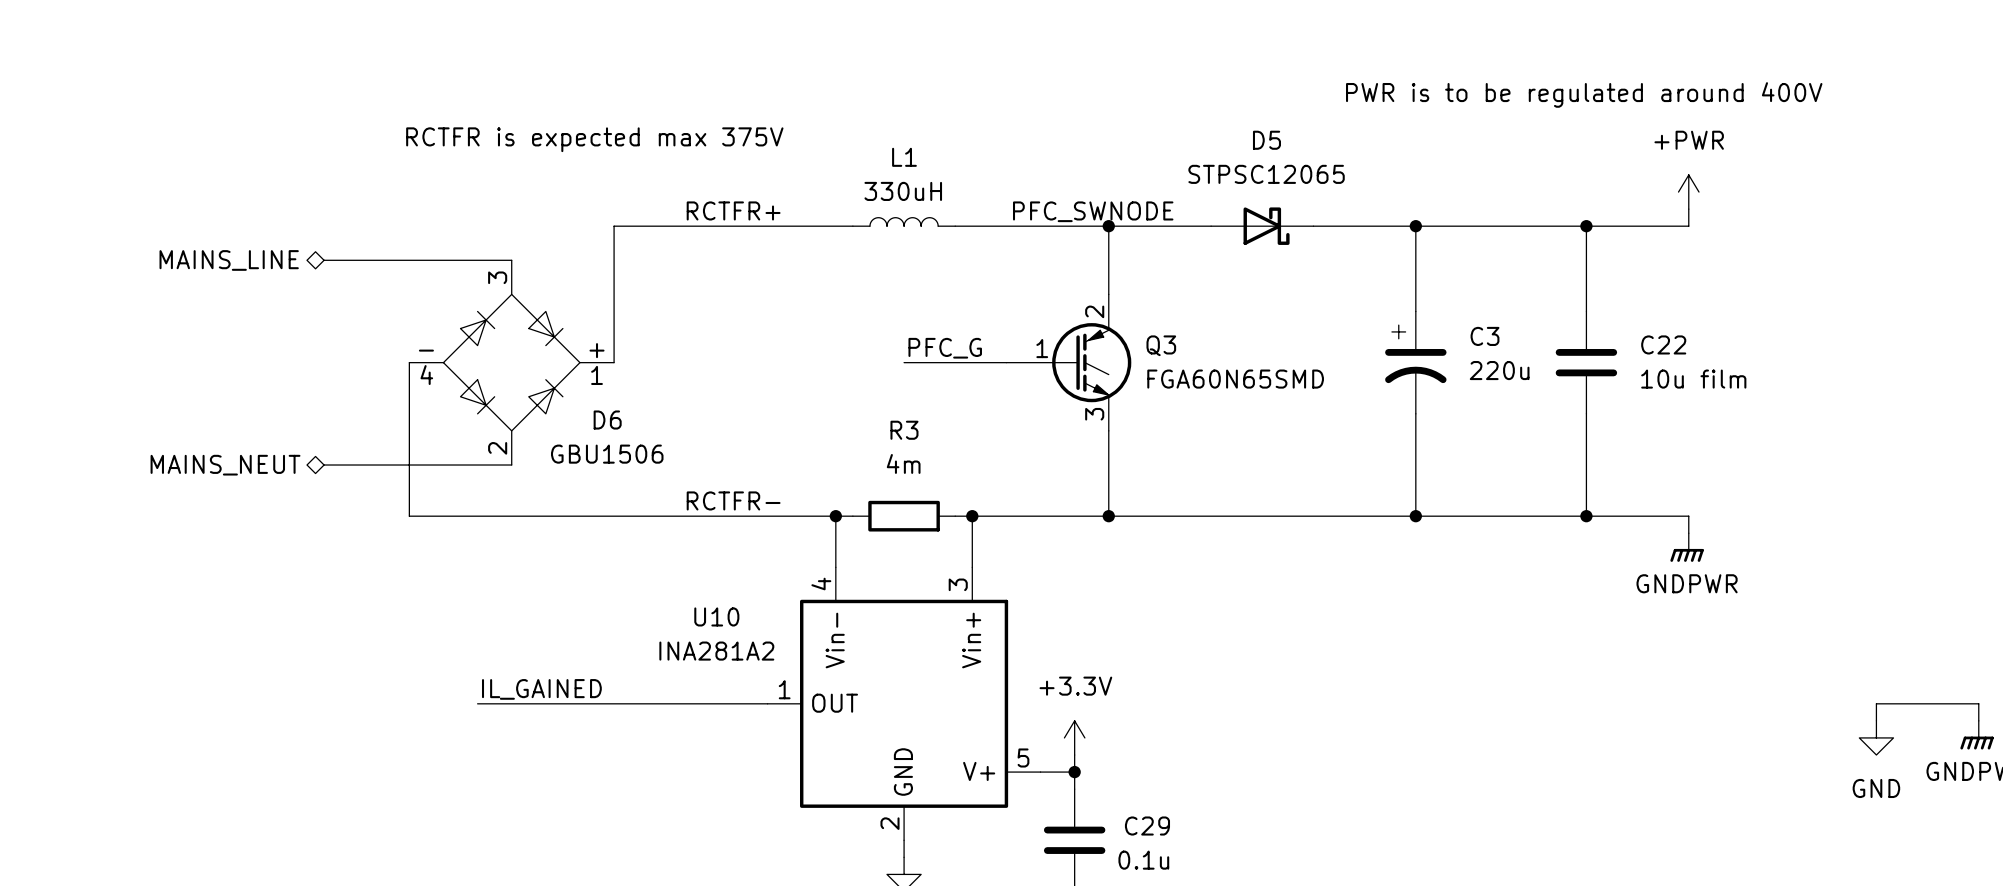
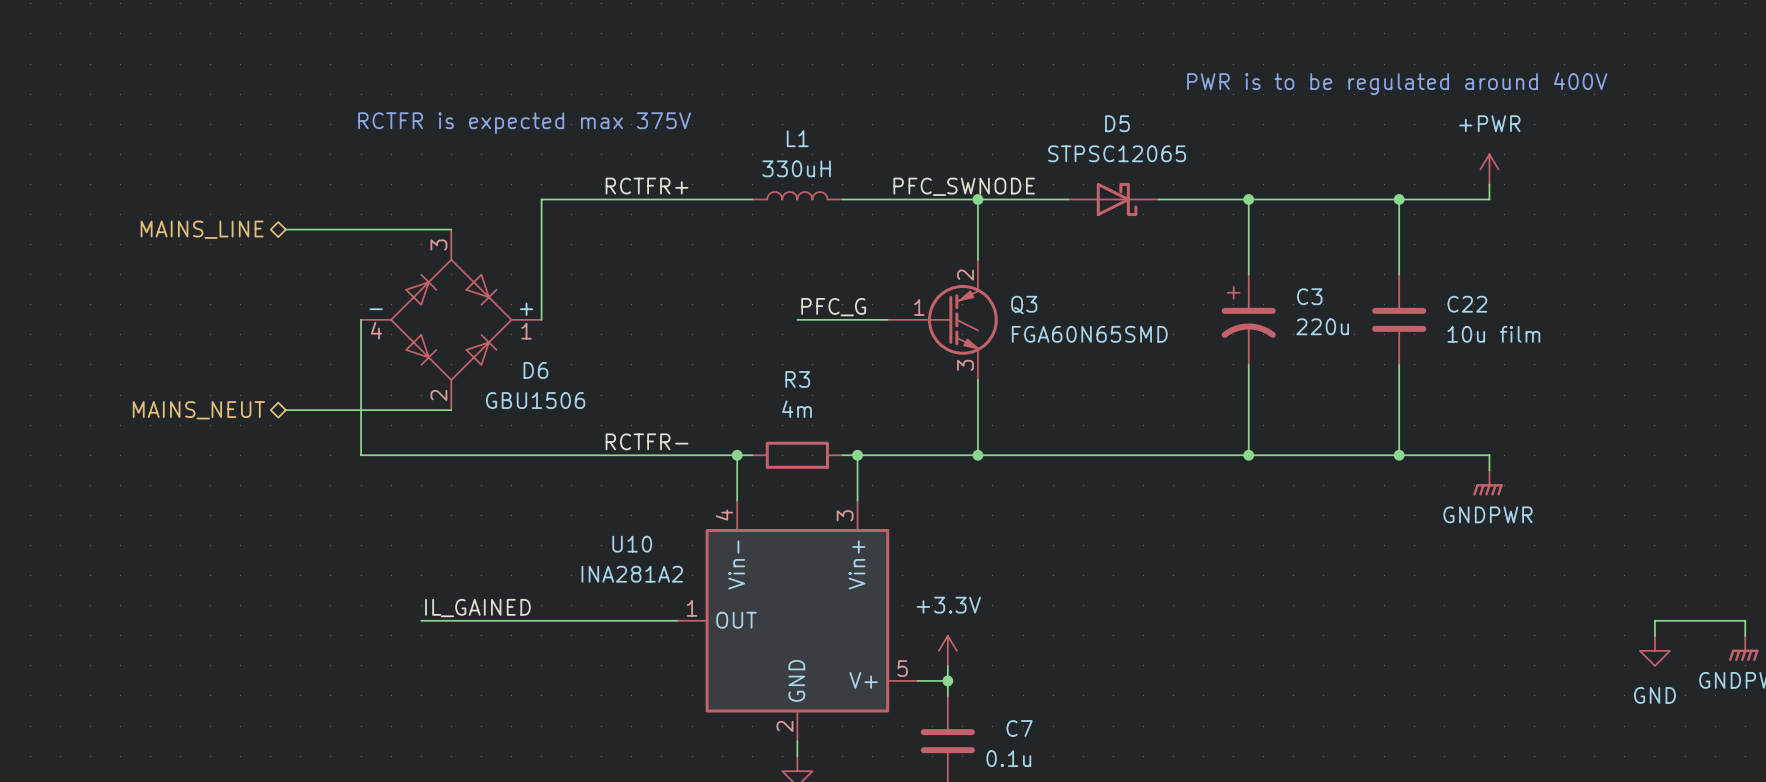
C29 name: C29 (1147, 826) -> C7 (1019, 728)

